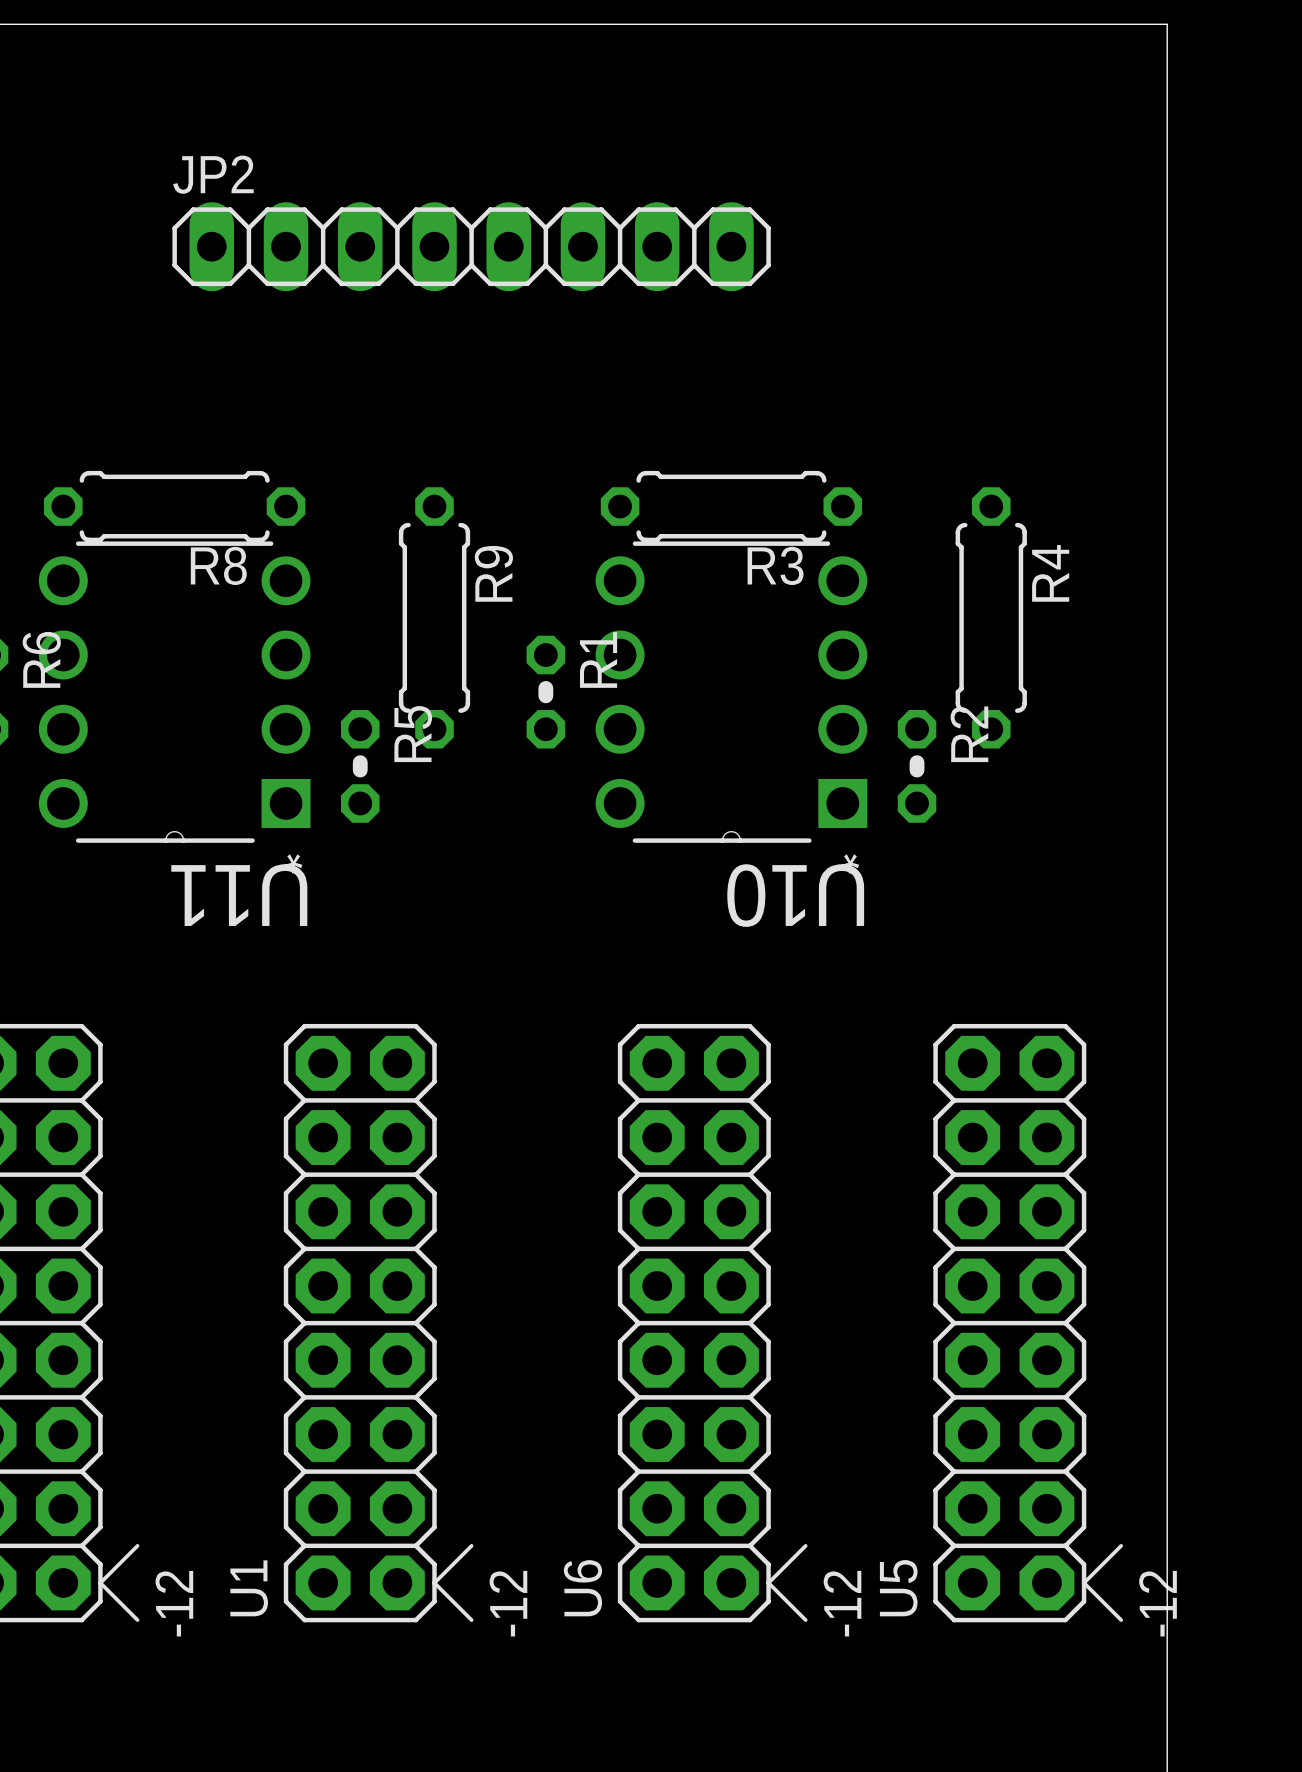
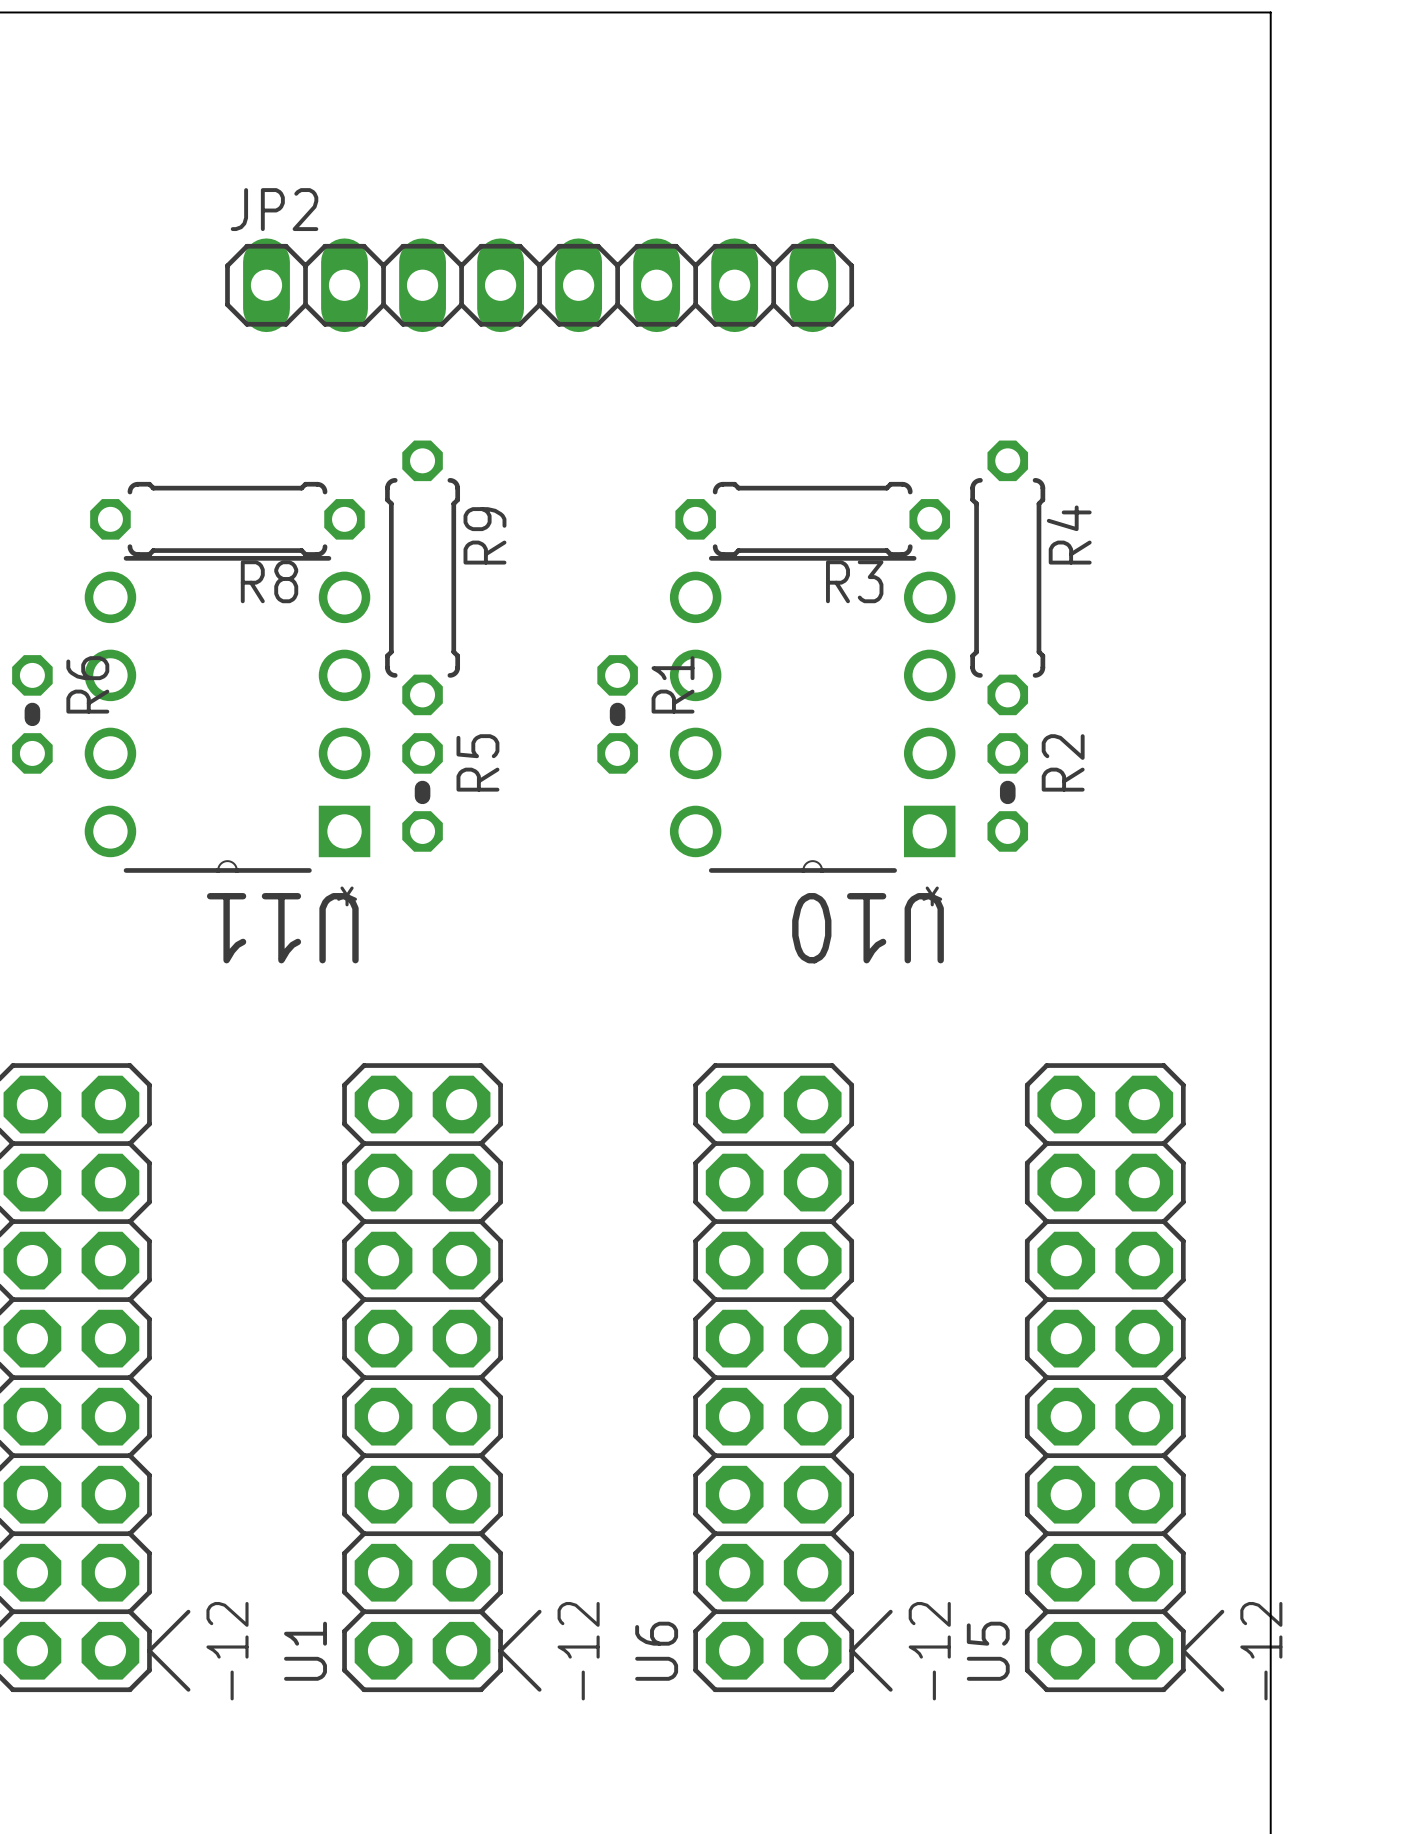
JP2 position: (471, 246) -> (539, 285)
R9 position: (434, 617) -> (422, 577)
R4 position: (991, 617) -> (1007, 577)

